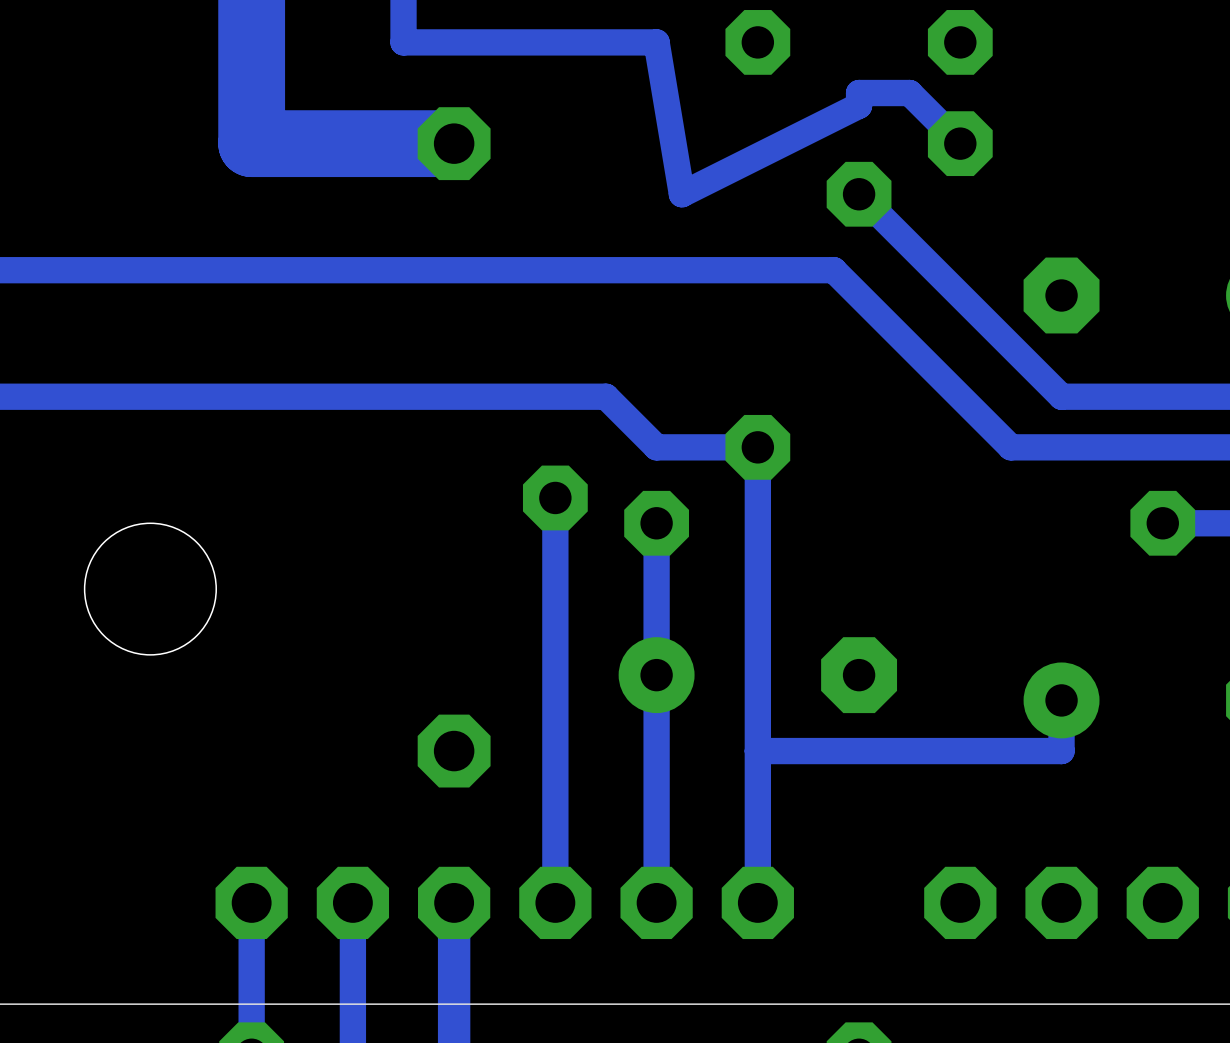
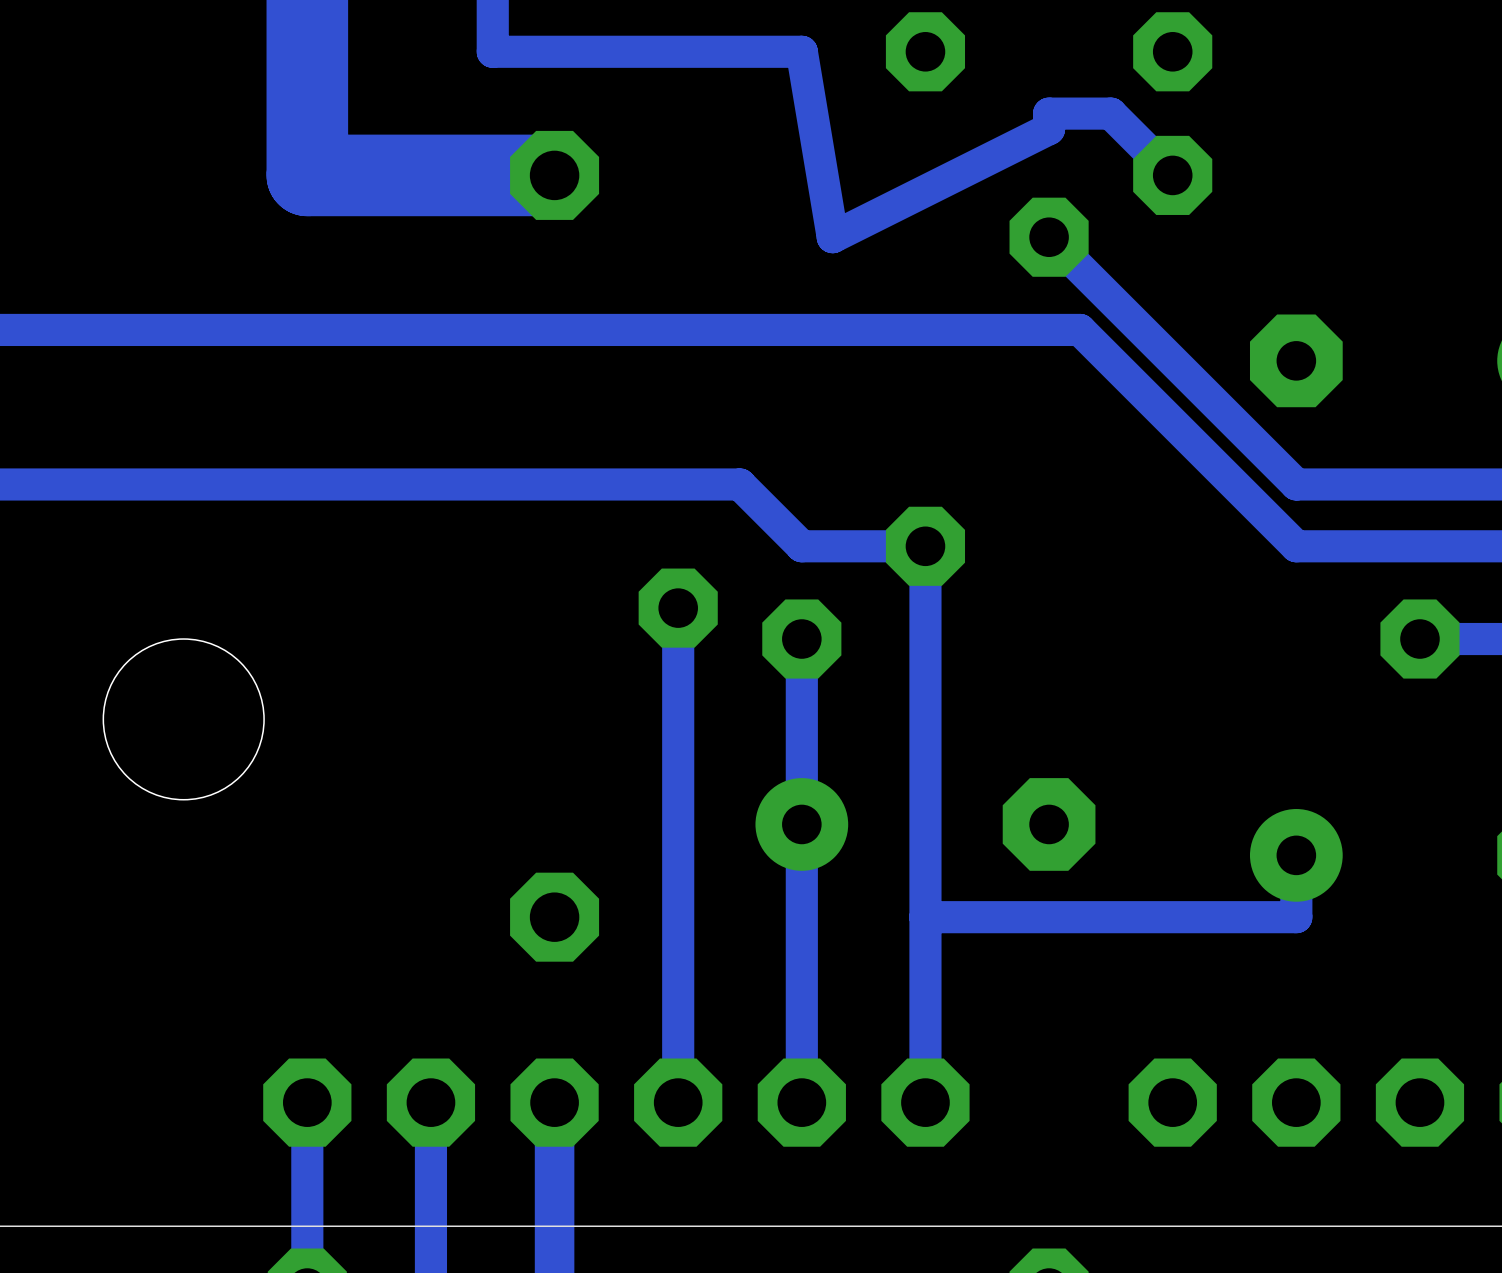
track: (833, 270) (1010, 447) (1061, 447) -> (1018, 329) (1079, 329) (1296, 546)

